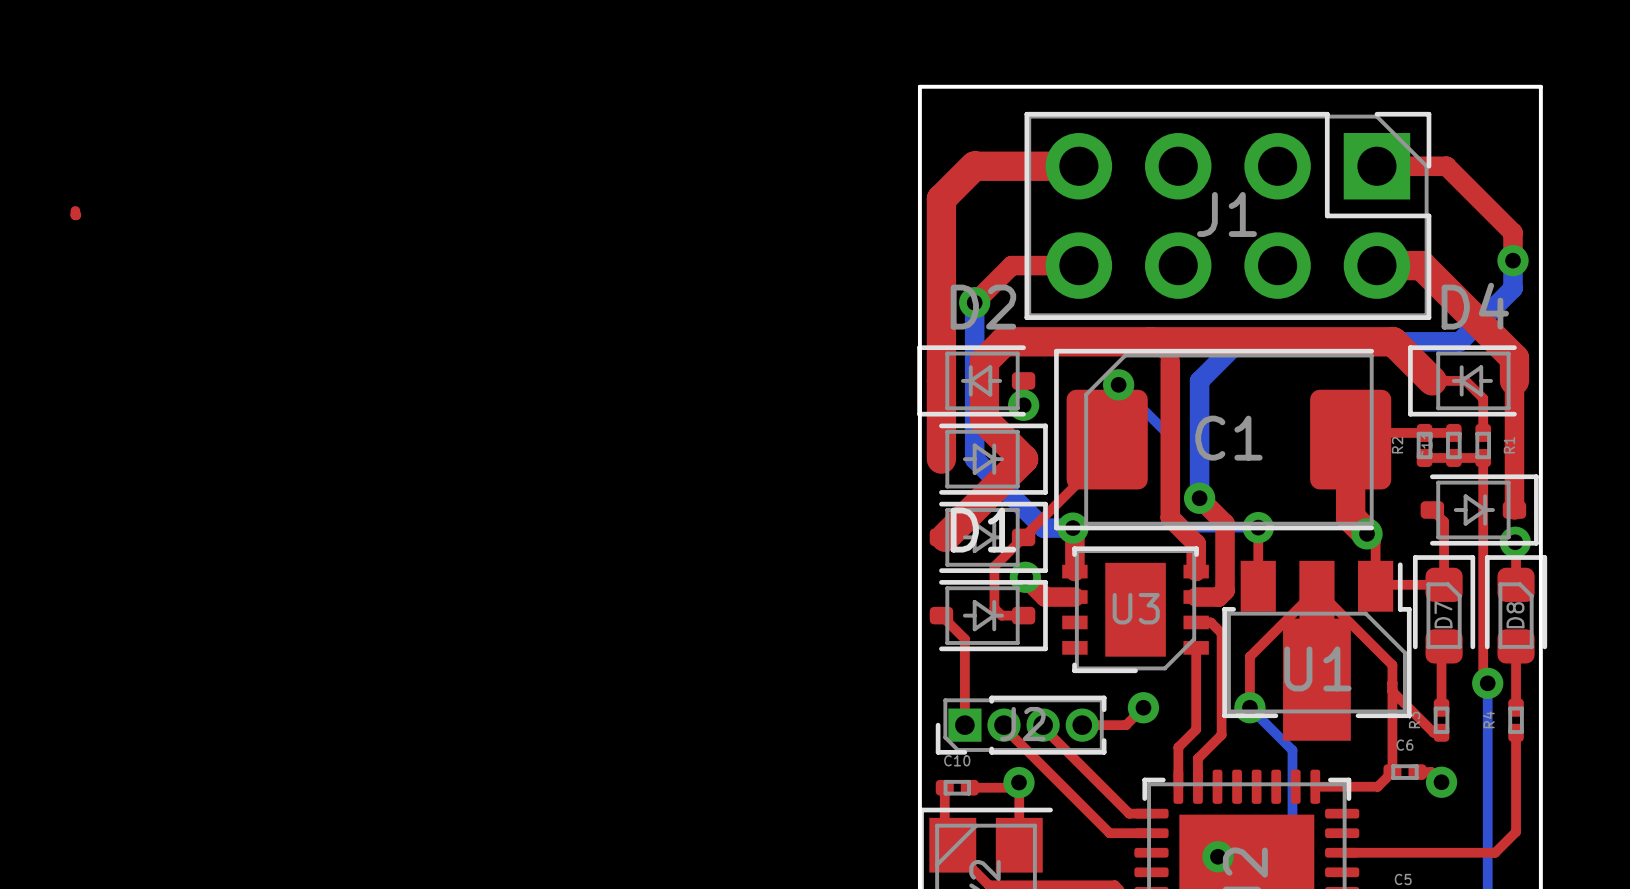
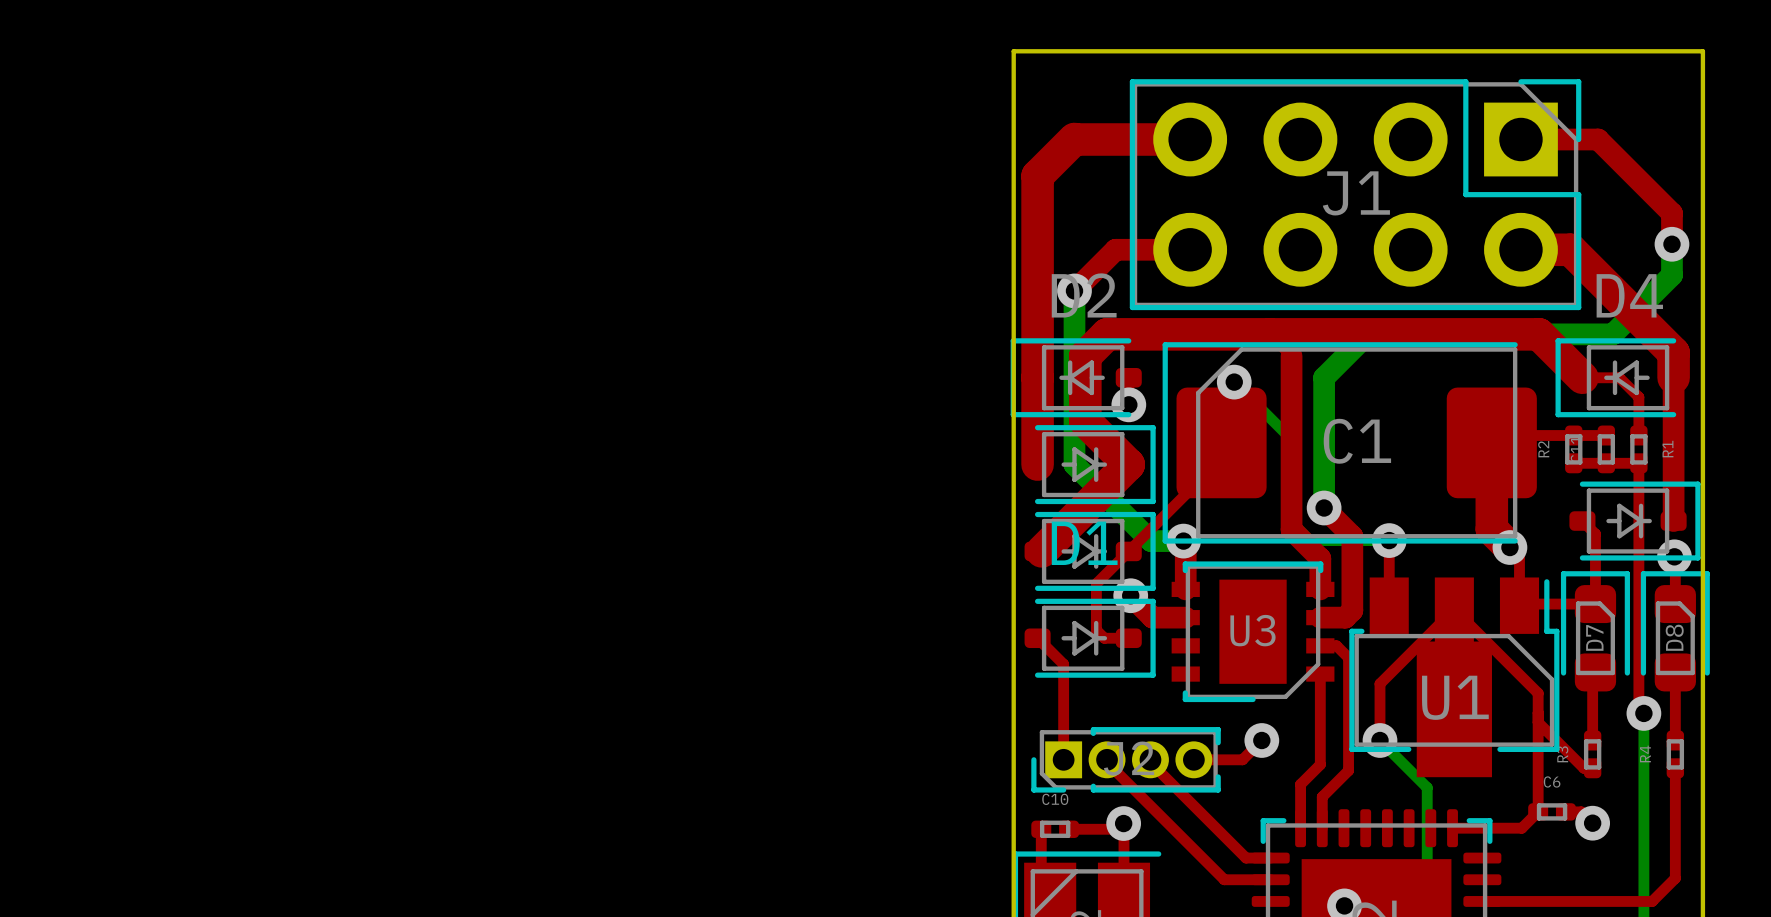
top track: (75, 210) (76, 215) -> none

